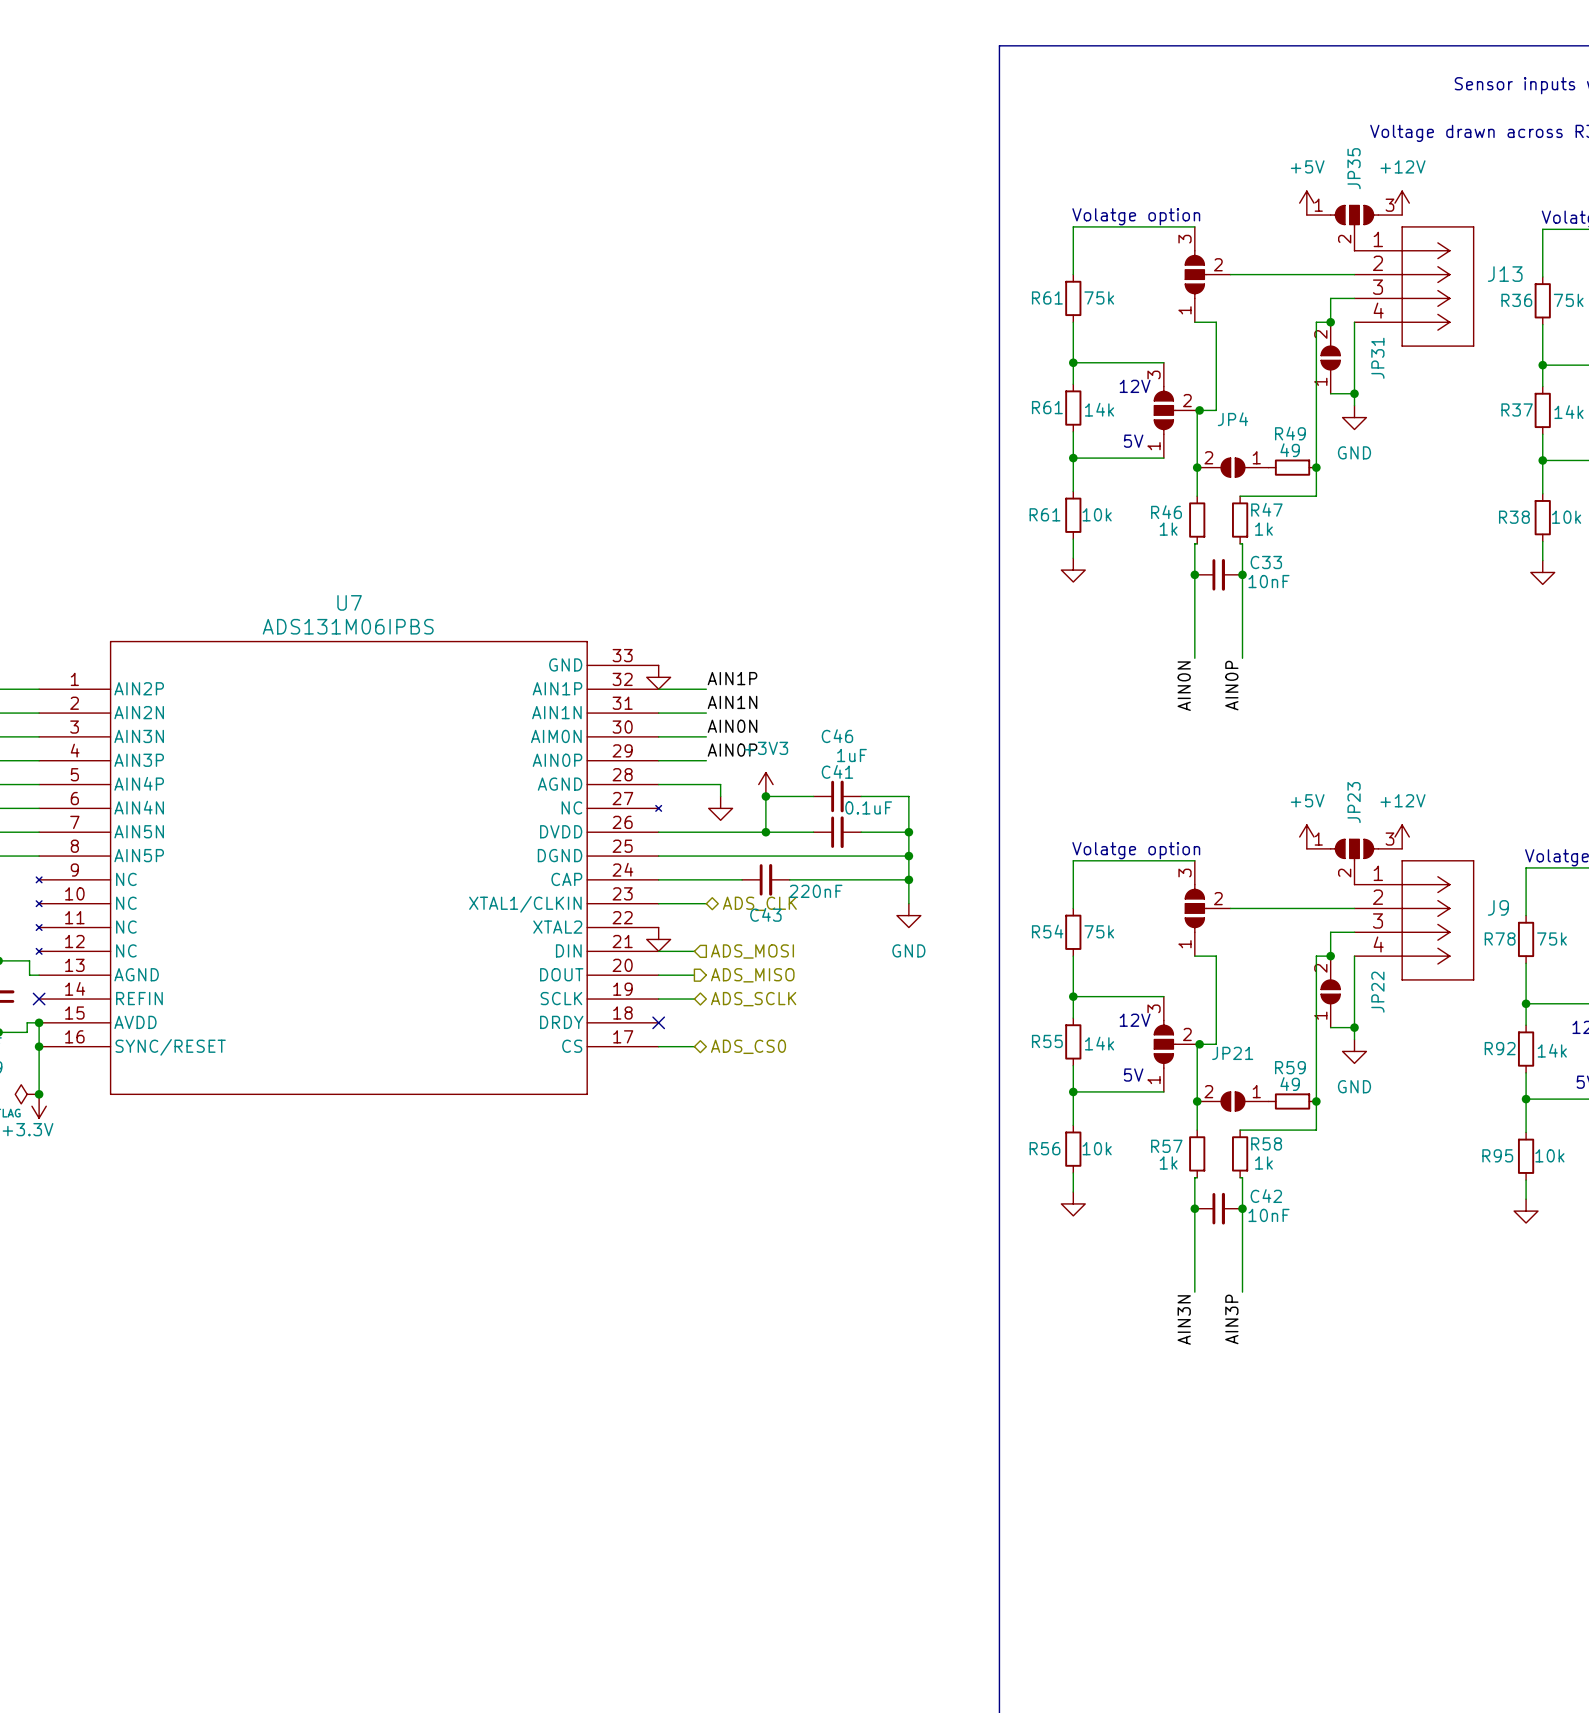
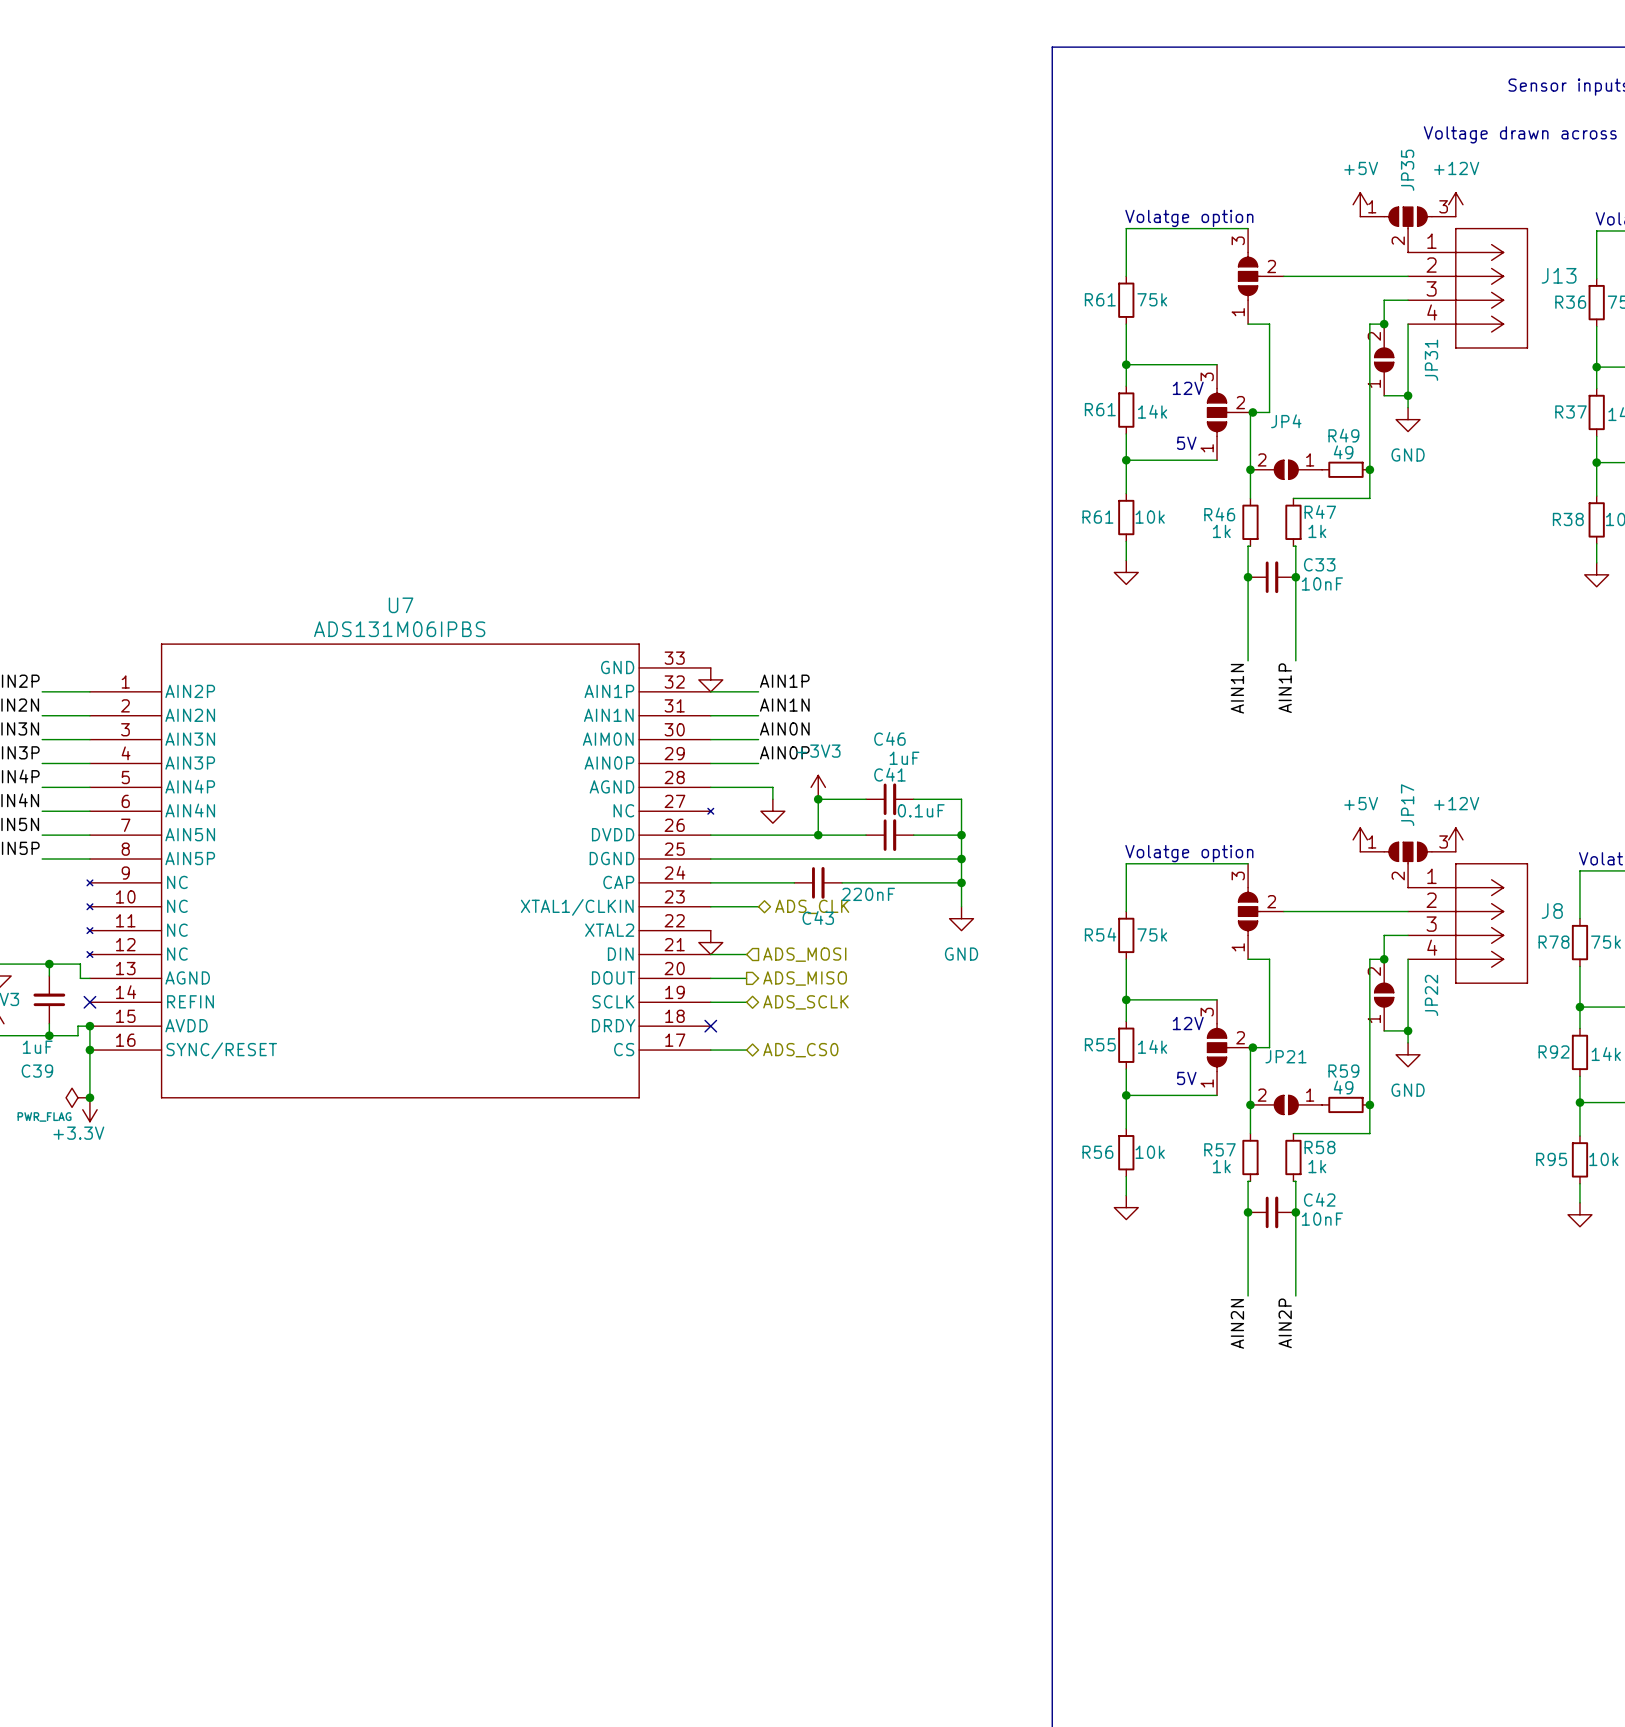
label: AIN0P (1231, 685) -> AIN1P (1285, 688)
label: AIN0N (1184, 686) -> AIN1N (1237, 688)
JP23 name: JP23 (1354, 802) -> JP17 (1407, 805)
J9 name: J9 (1498, 907) -> J8 (1552, 911)
label: AIN3P (1231, 1319) -> AIN2P (1285, 1323)
label: AIN3N (1184, 1320) -> AIN2N (1237, 1323)

